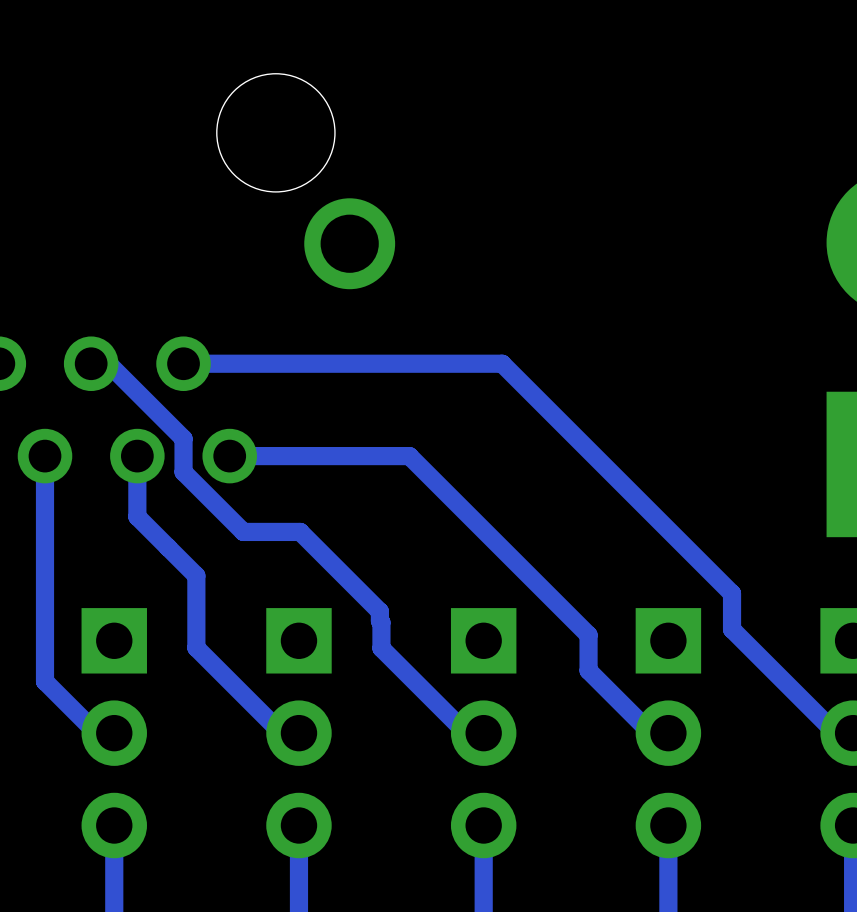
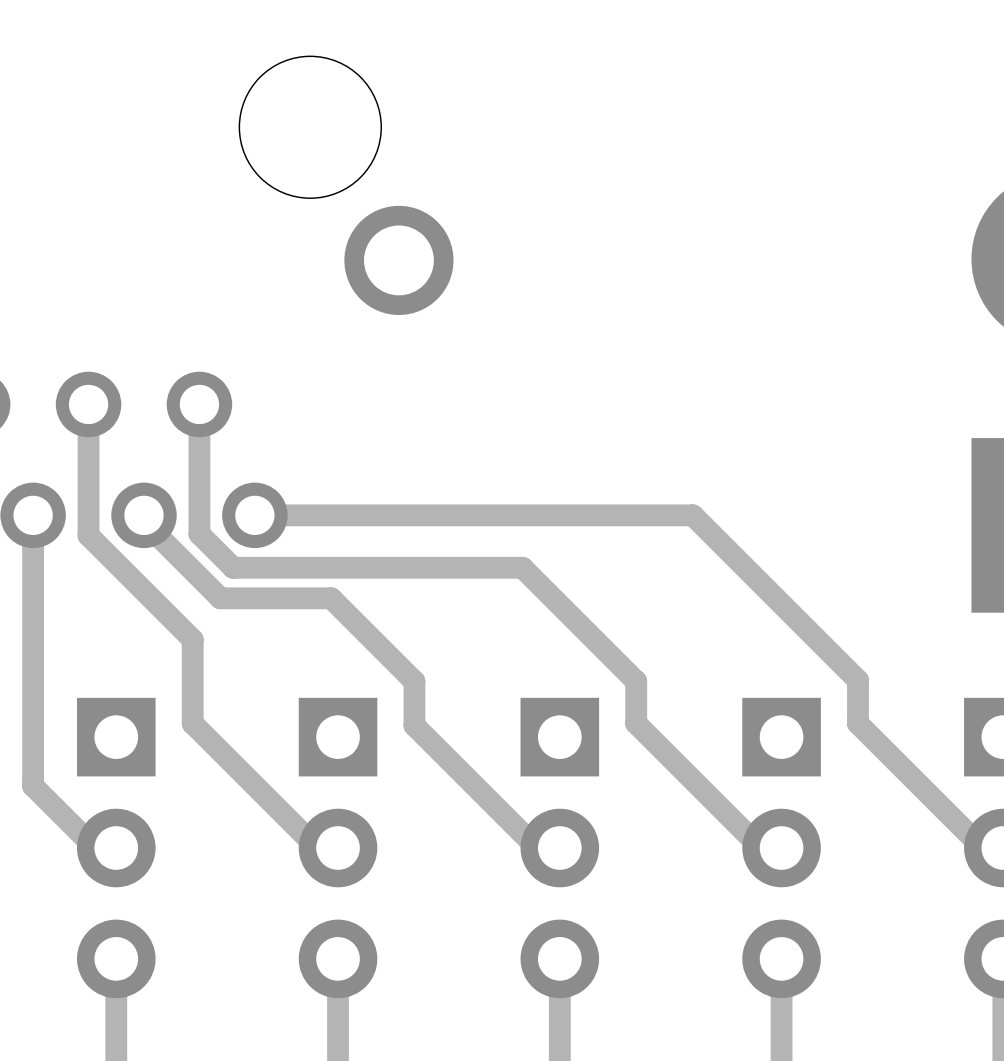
track: (91, 363) (108, 363) (183, 438) -> (199, 404) (199, 494)
track: (183, 363) (502, 363) (594, 456) -> (470, 515) (692, 515)
track: (409, 456) (588, 635) (588, 670) (651, 733) -> (199, 534) (233, 567) (522, 567) (636, 681) (636, 723) (760, 848)
track: (137, 461) (137, 516) (196, 575) (196, 647) -> (88, 404) (88, 535) (192, 639) (192, 723) (214, 745)
track: (183, 472) (243, 531) (300, 531) (379, 611) (381, 648) (466, 733) -> (144, 521) (220, 598) (331, 598) (414, 681) (414, 725) (539, 848)

